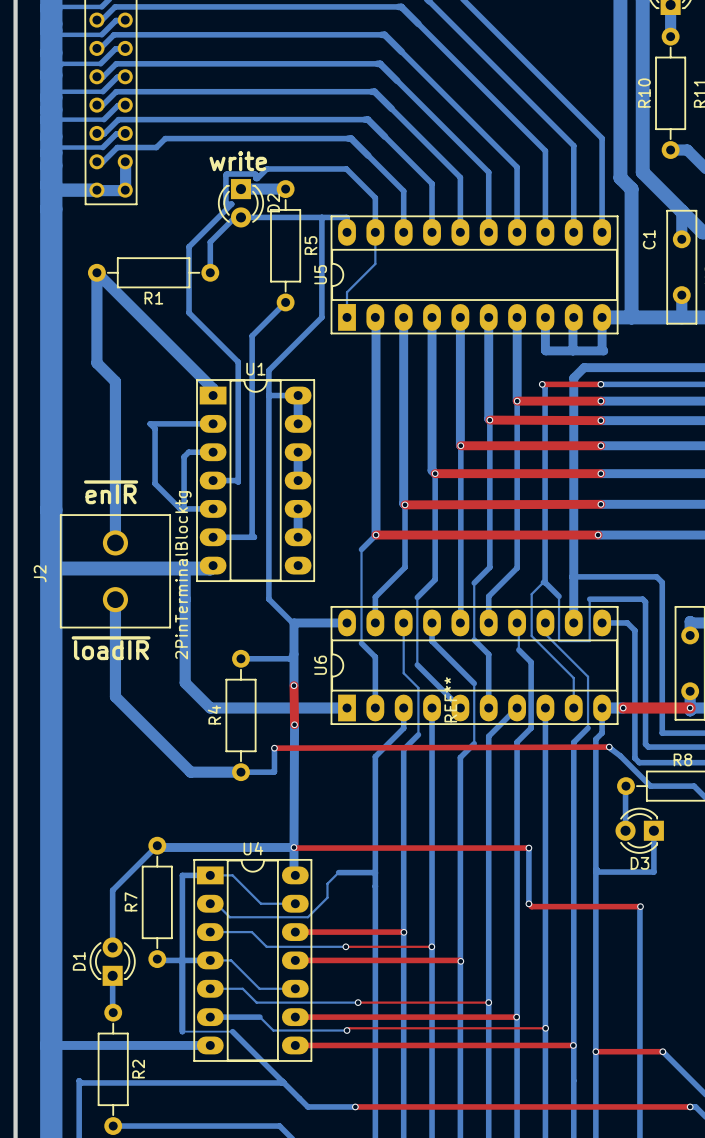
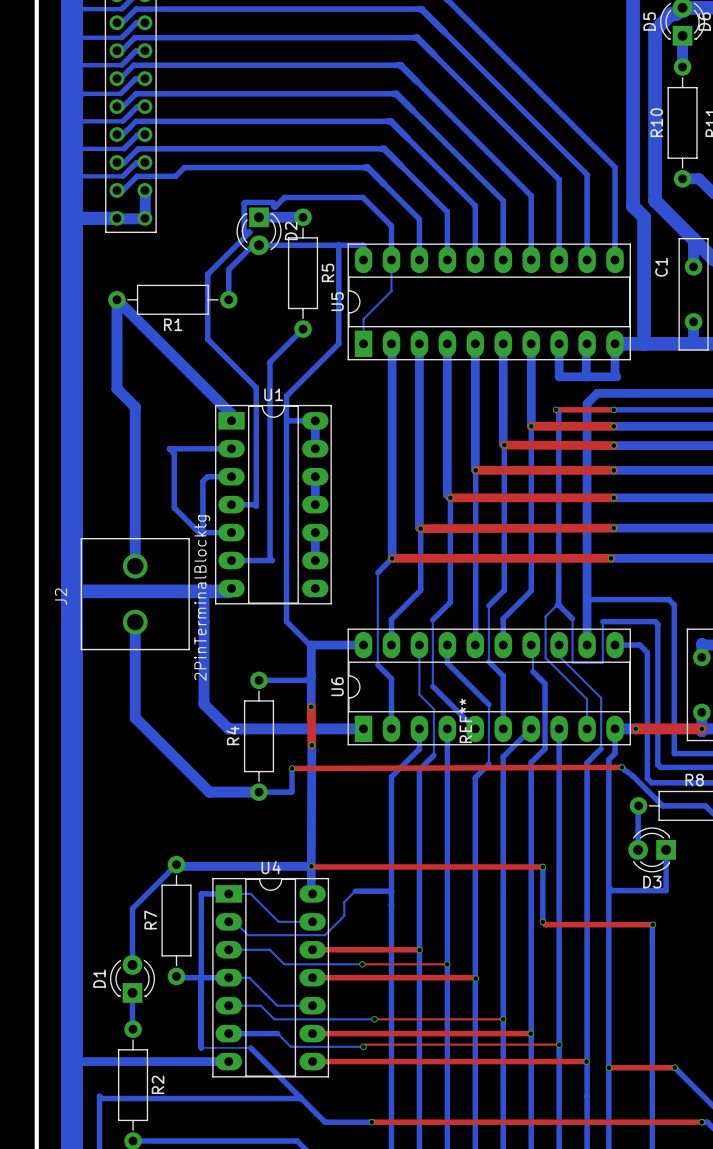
text: write (238, 161) -> none
text: ~{enIR} (111, 492) -> none
text: ~{loadIR} (111, 648) -> none

